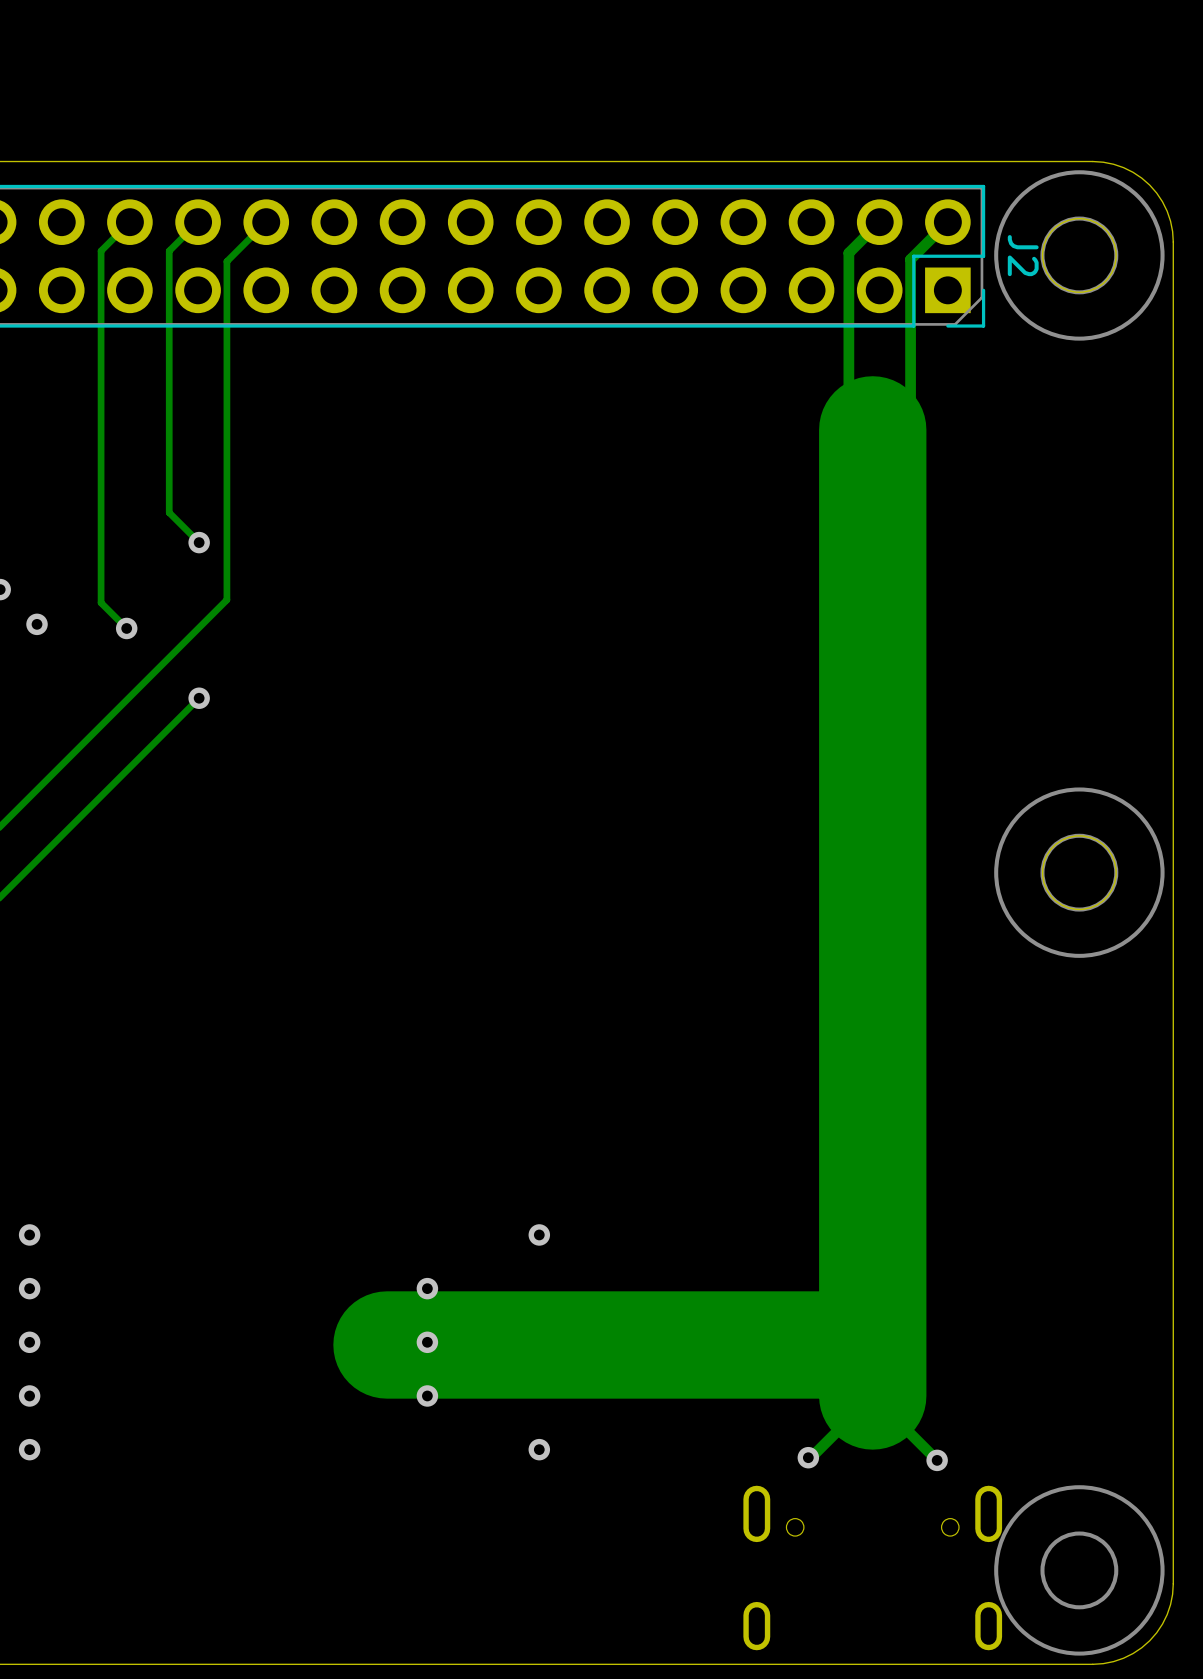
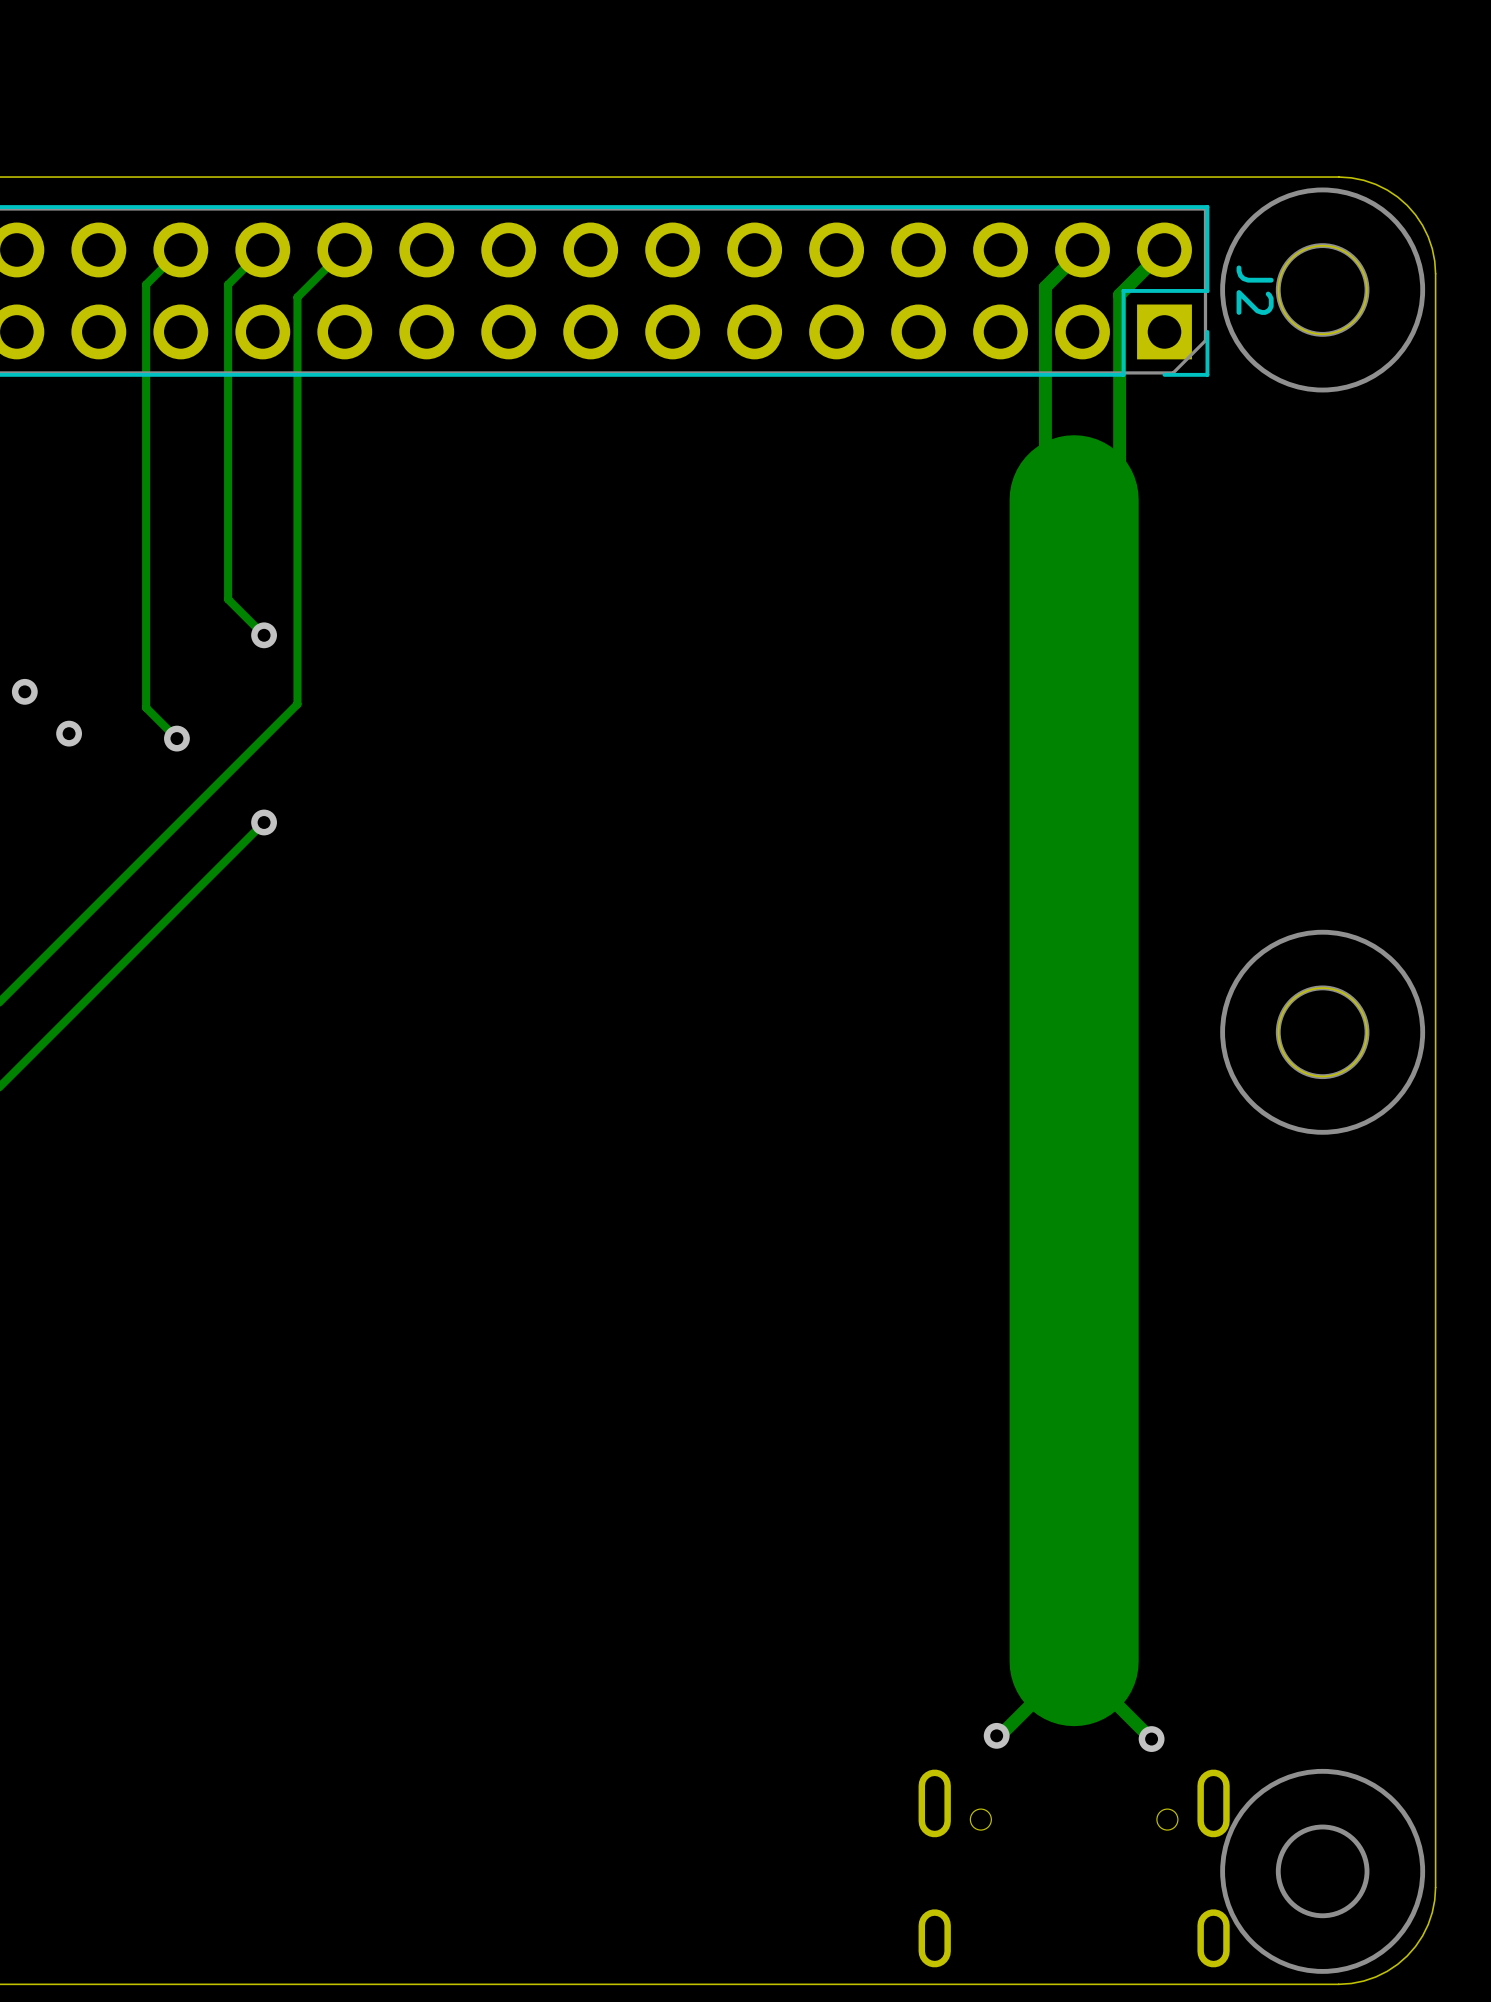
via: (29, 1234) -> none
via: (539, 1234) -> none
via: (29, 1288) -> none
via: (427, 1288) -> none
via: (29, 1342) -> none
track: (427, 1342) (389, 1342) (387, 1344) (821, 1344) (872, 1395) -> none
via: (427, 1342) -> none
via: (29, 1395) -> none
via: (427, 1395) -> none
via: (29, 1449) -> none
via: (539, 1449) -> none

